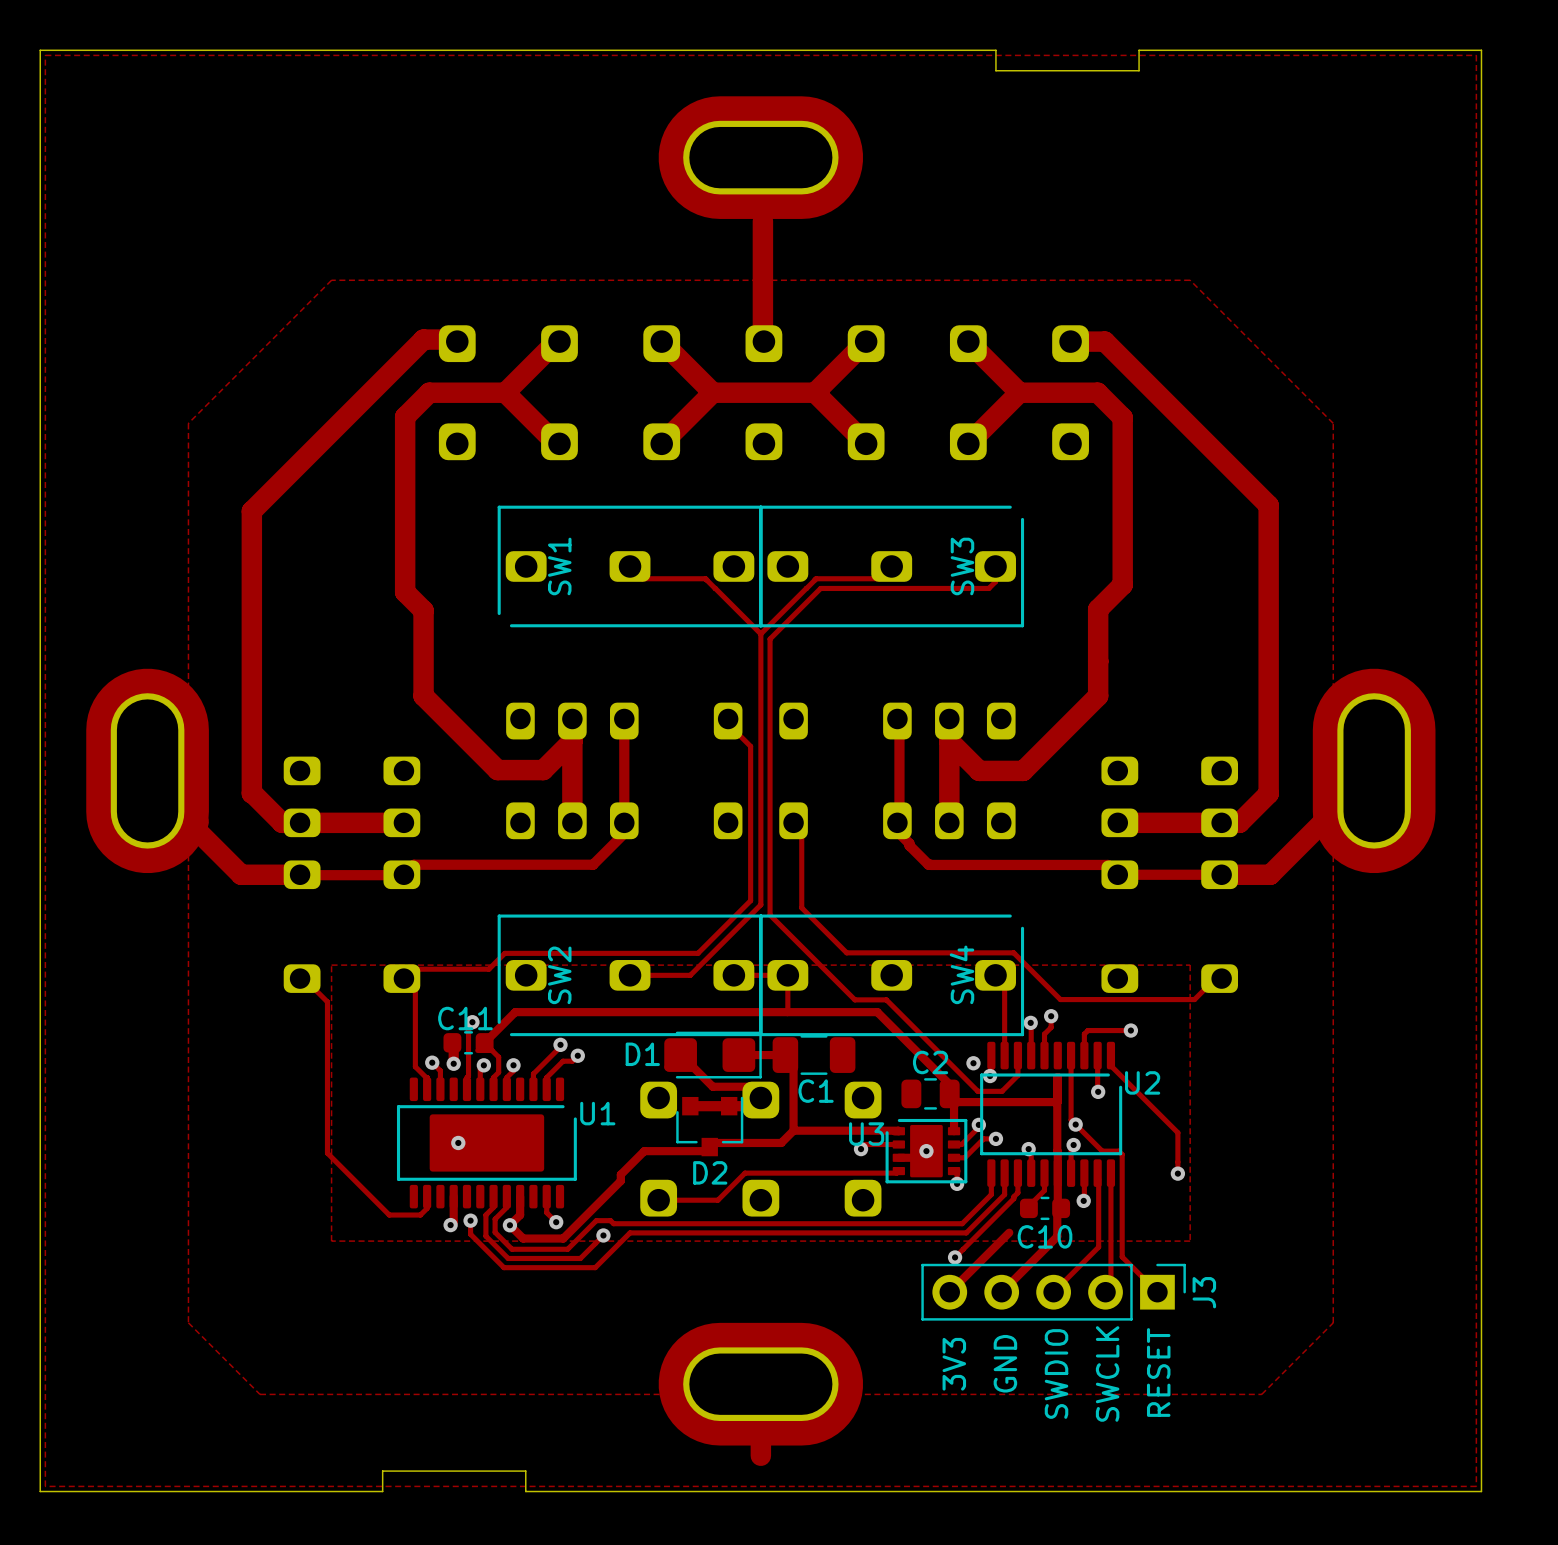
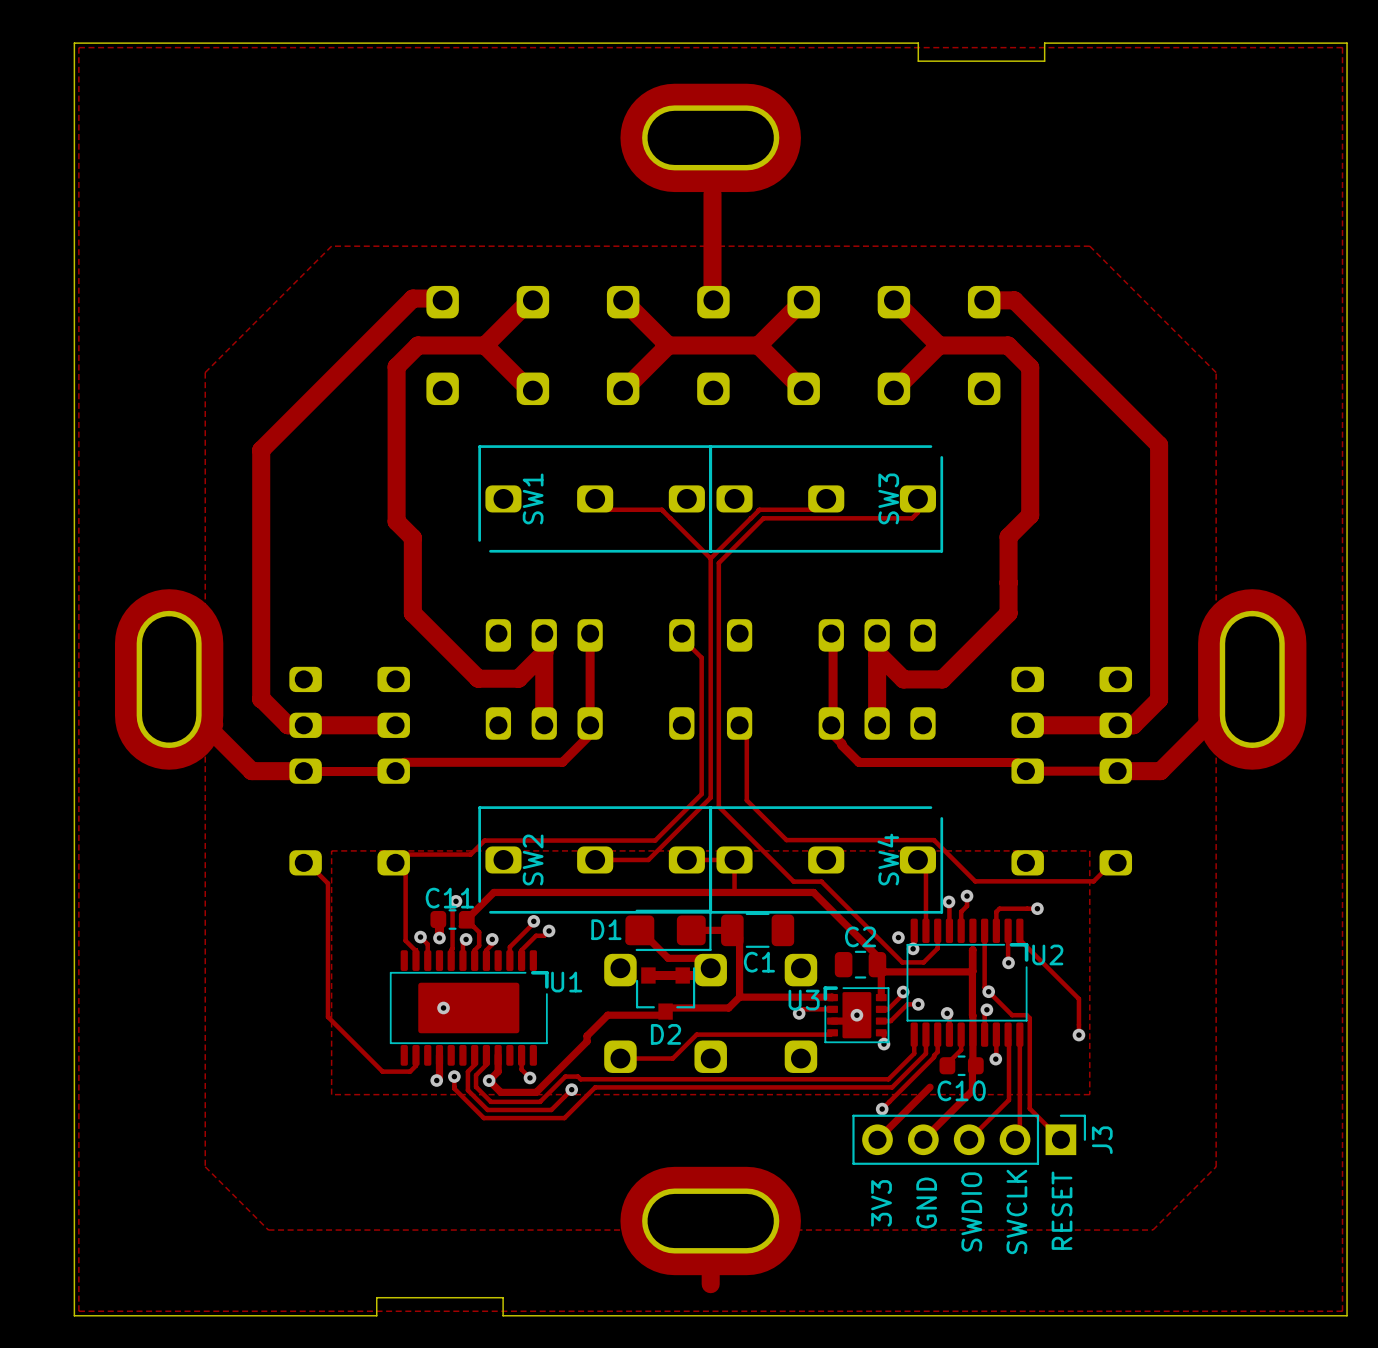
U2 footprint: [980, 1041, 1124, 1187] -> [906, 918, 1029, 1047]
U1 footprint: [396, 1077, 579, 1209] -> [389, 950, 549, 1066]
U3 footprint: [884, 1117, 968, 1184] -> [823, 986, 890, 1044]

